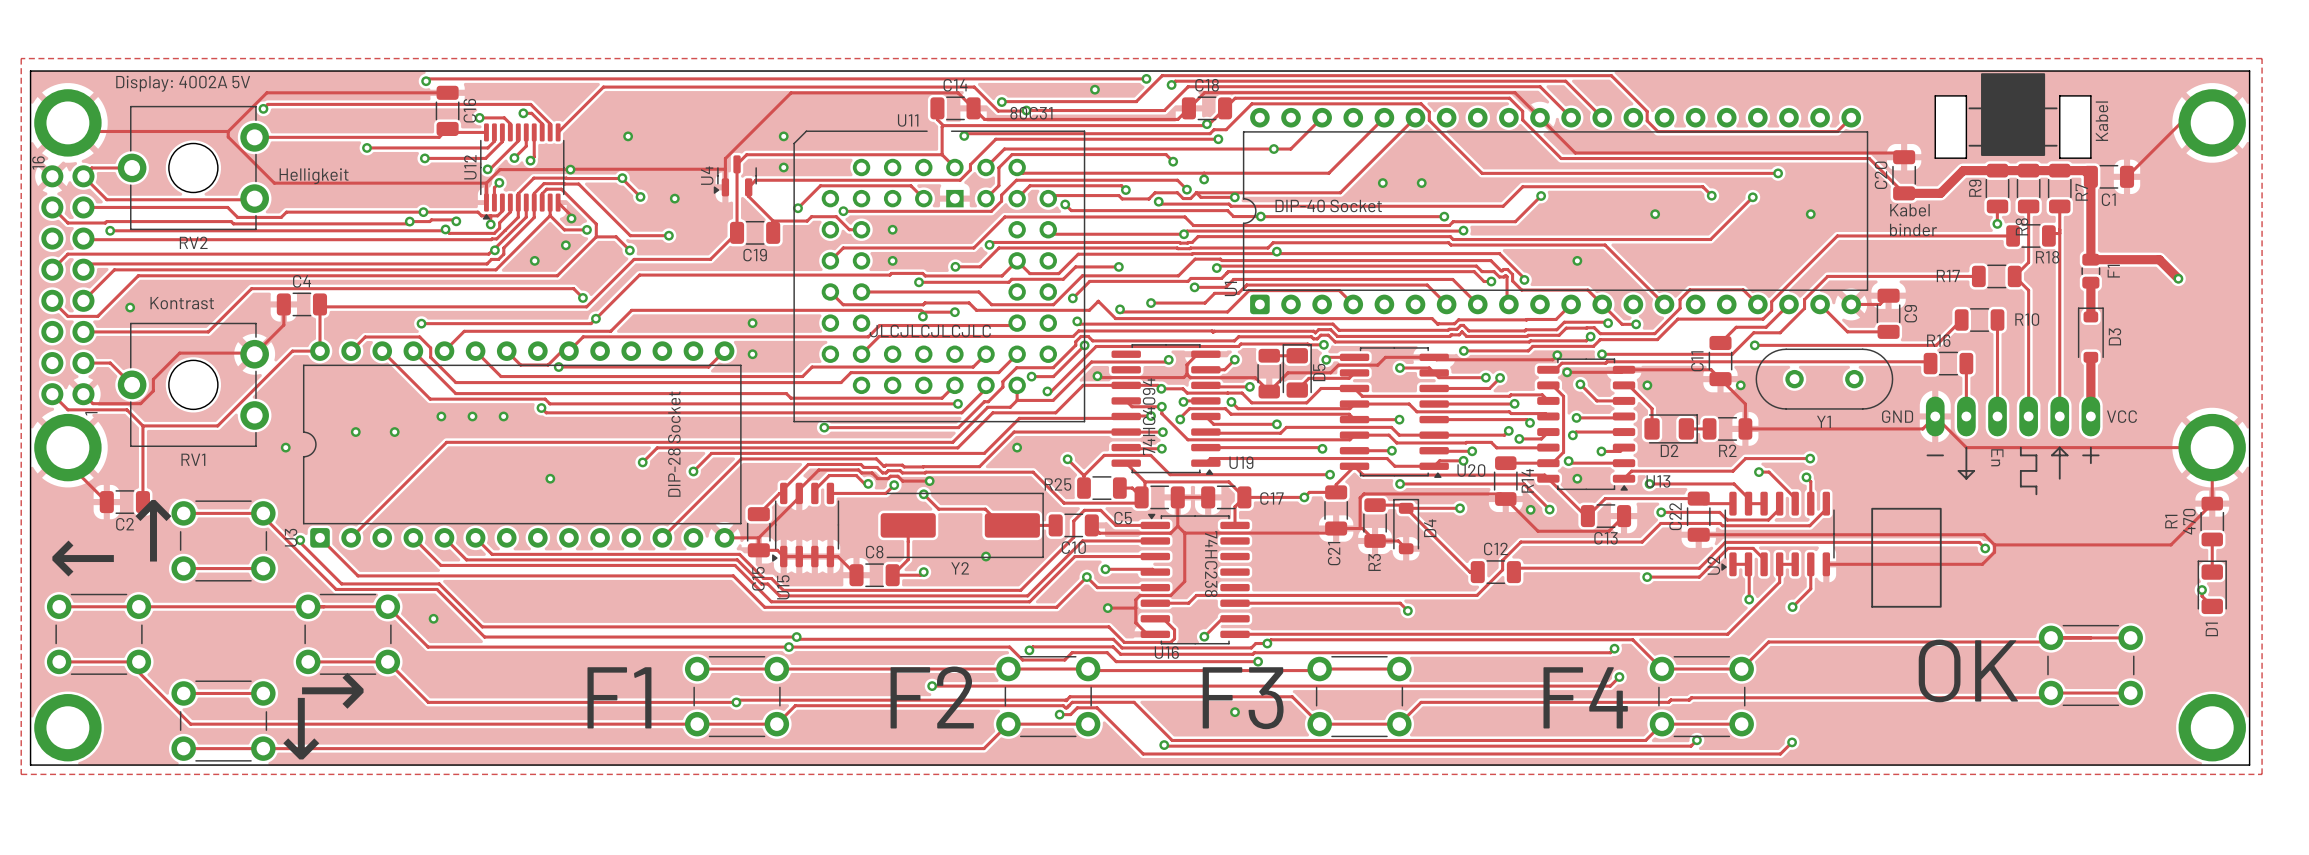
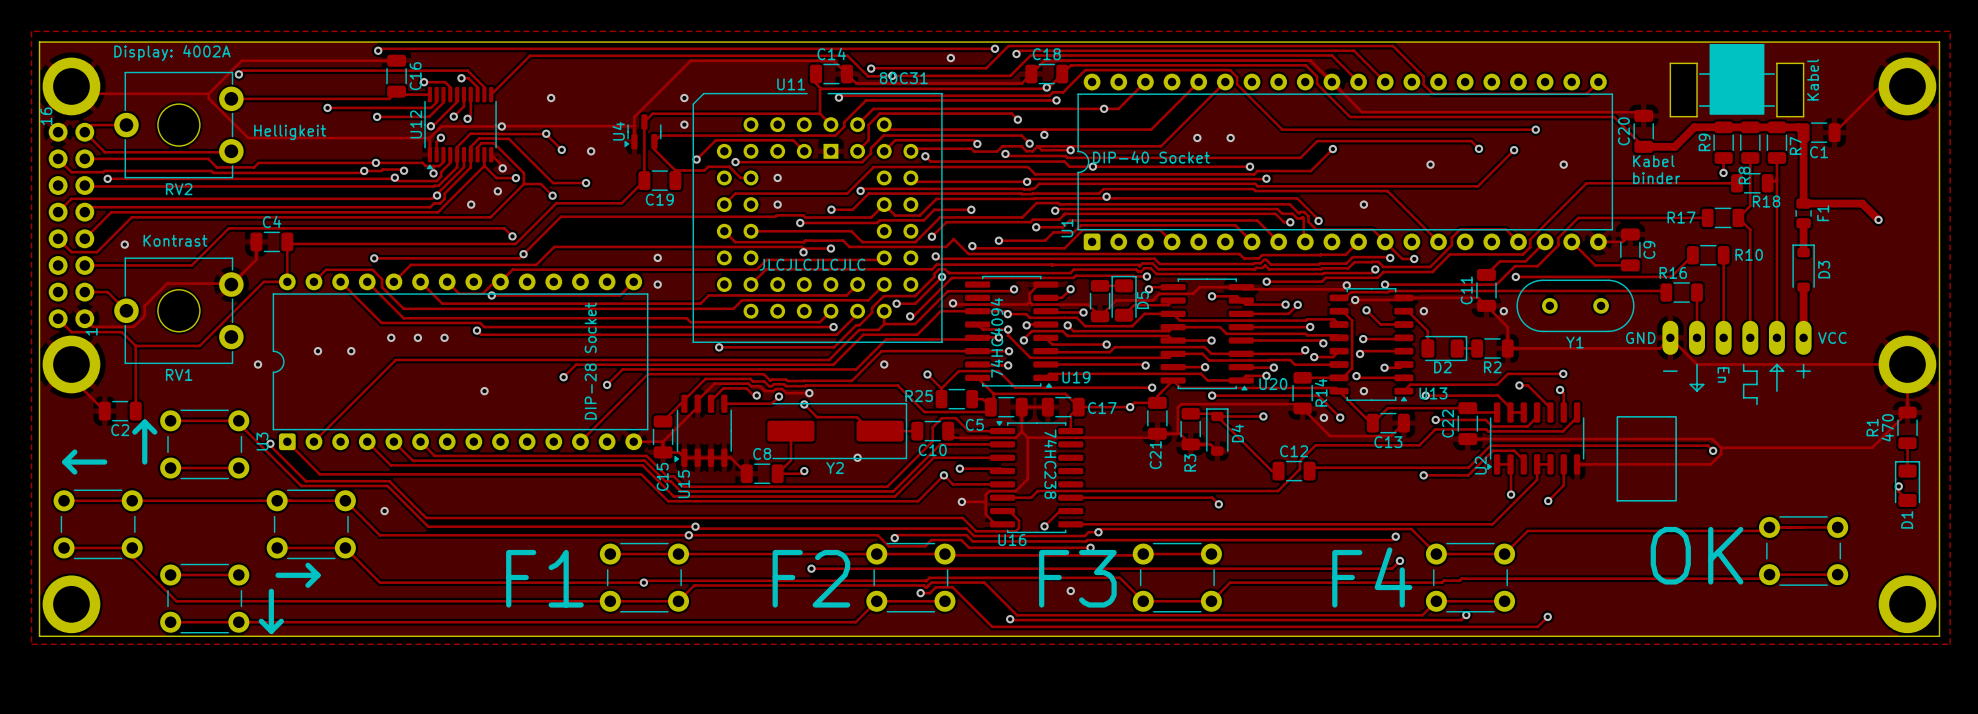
text: Display: 4002A 5V (183, 83) -> Display: 4002A (172, 53)

